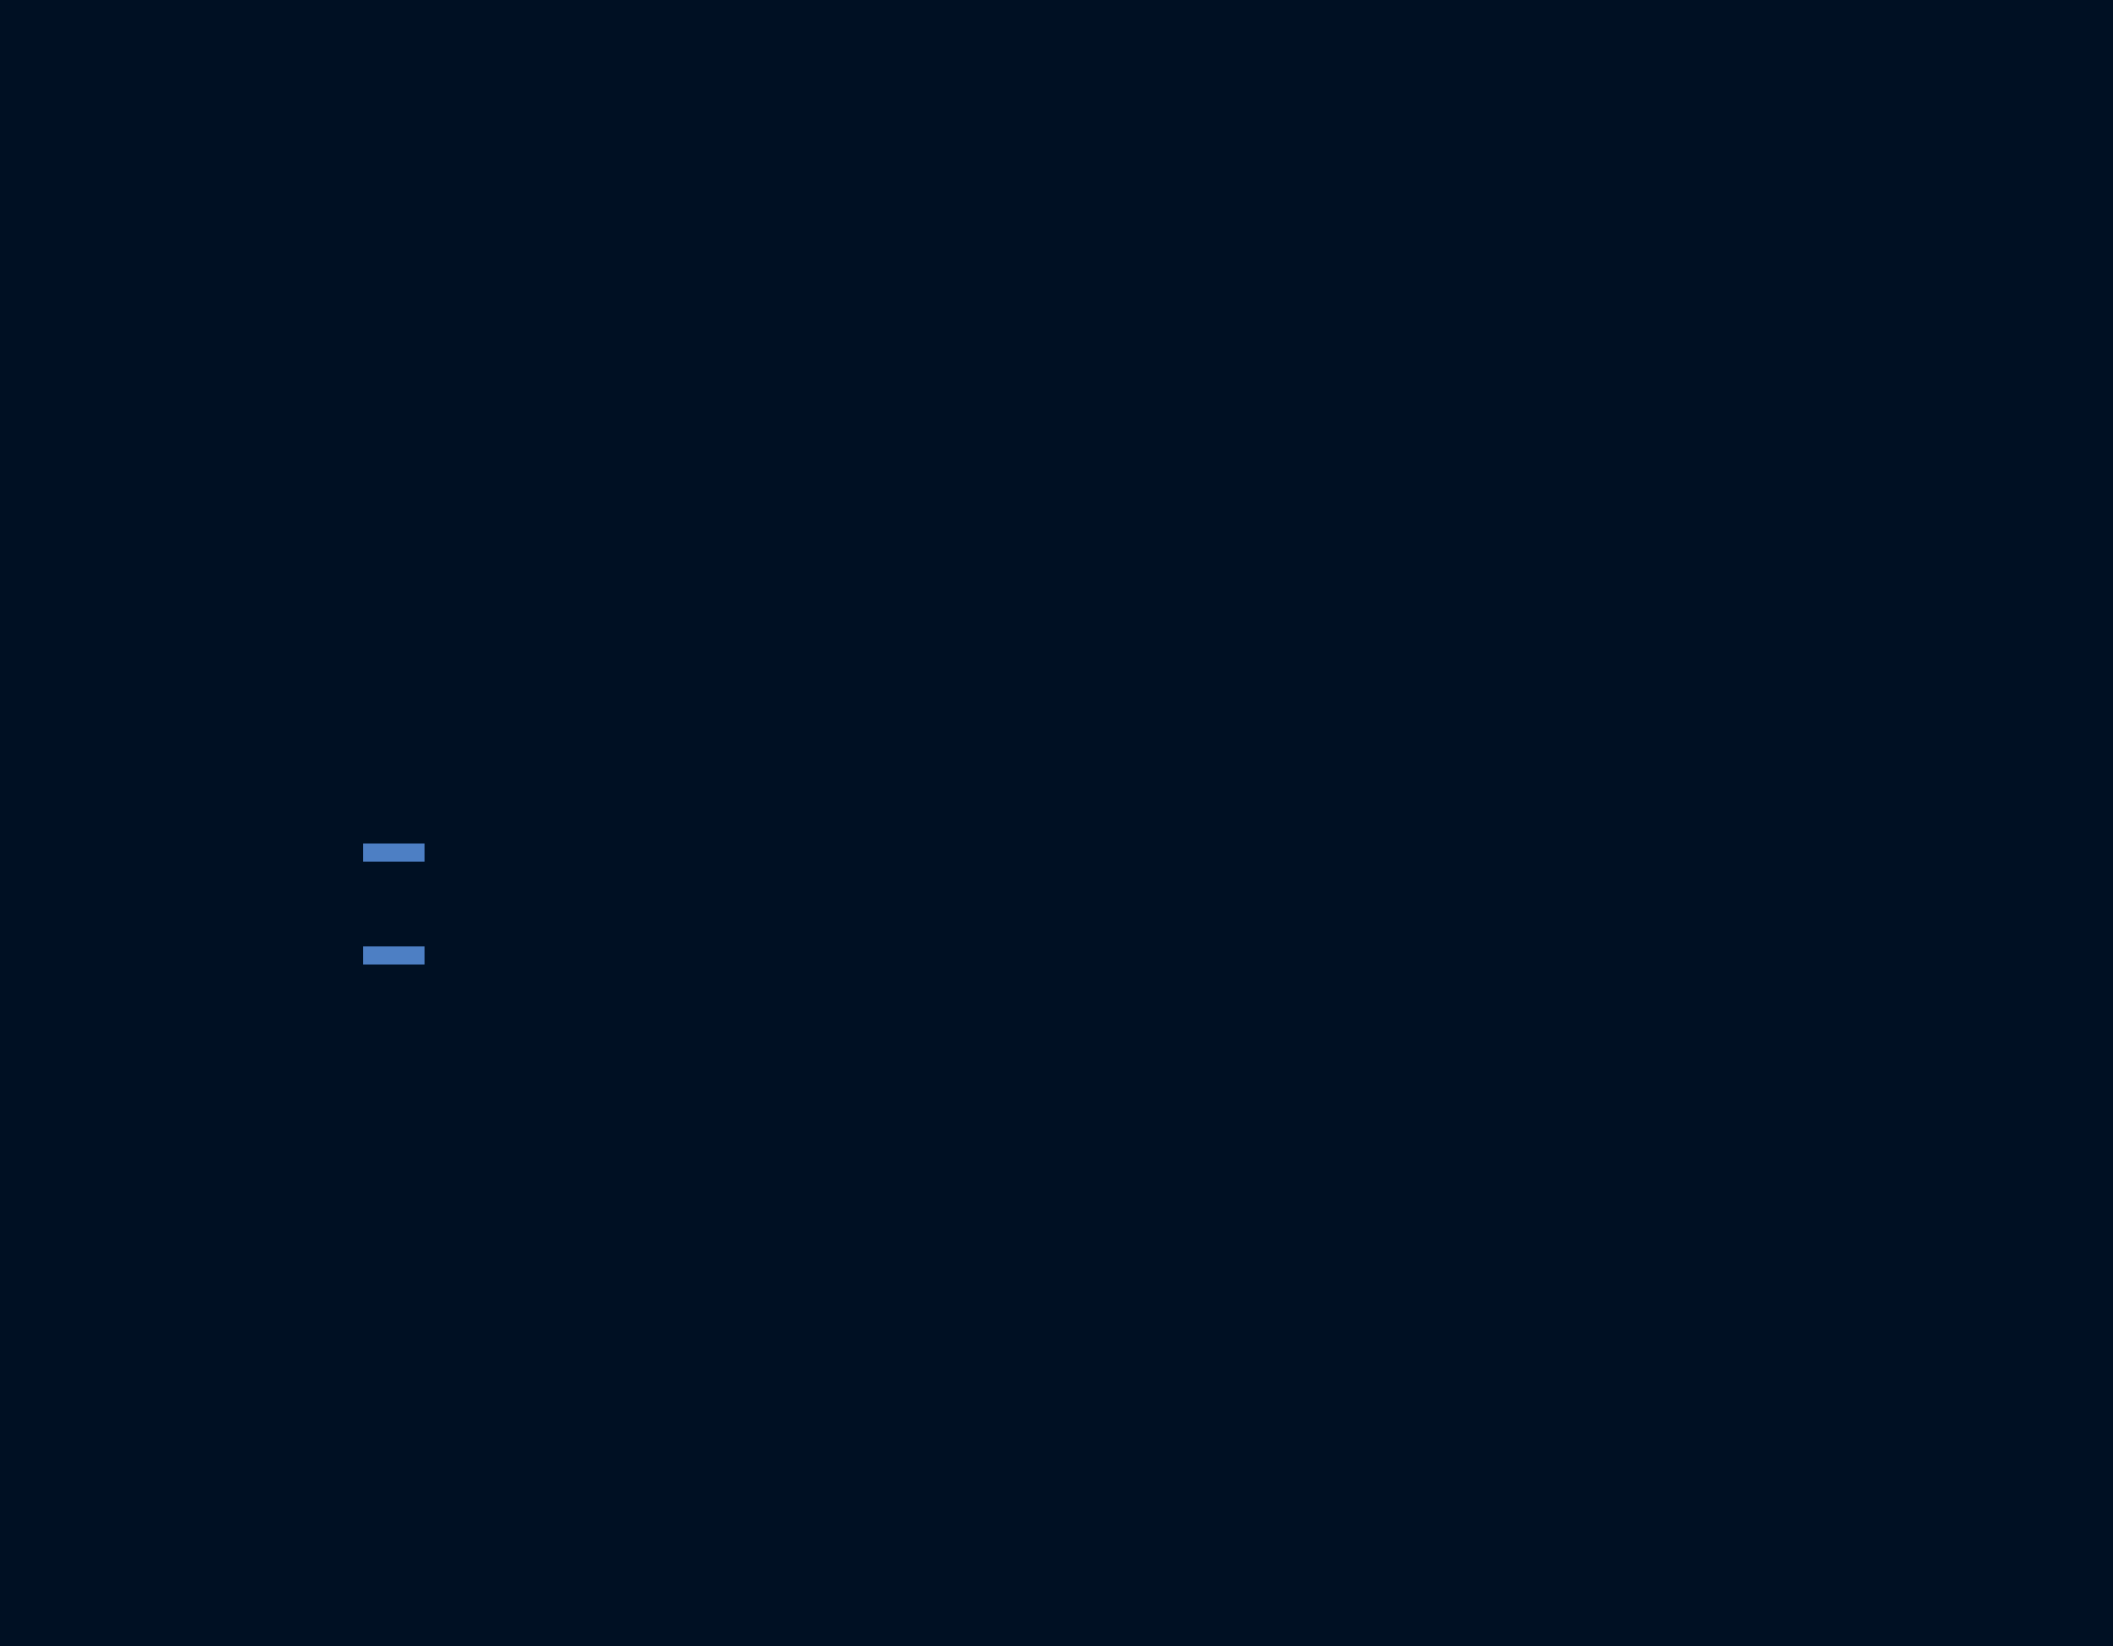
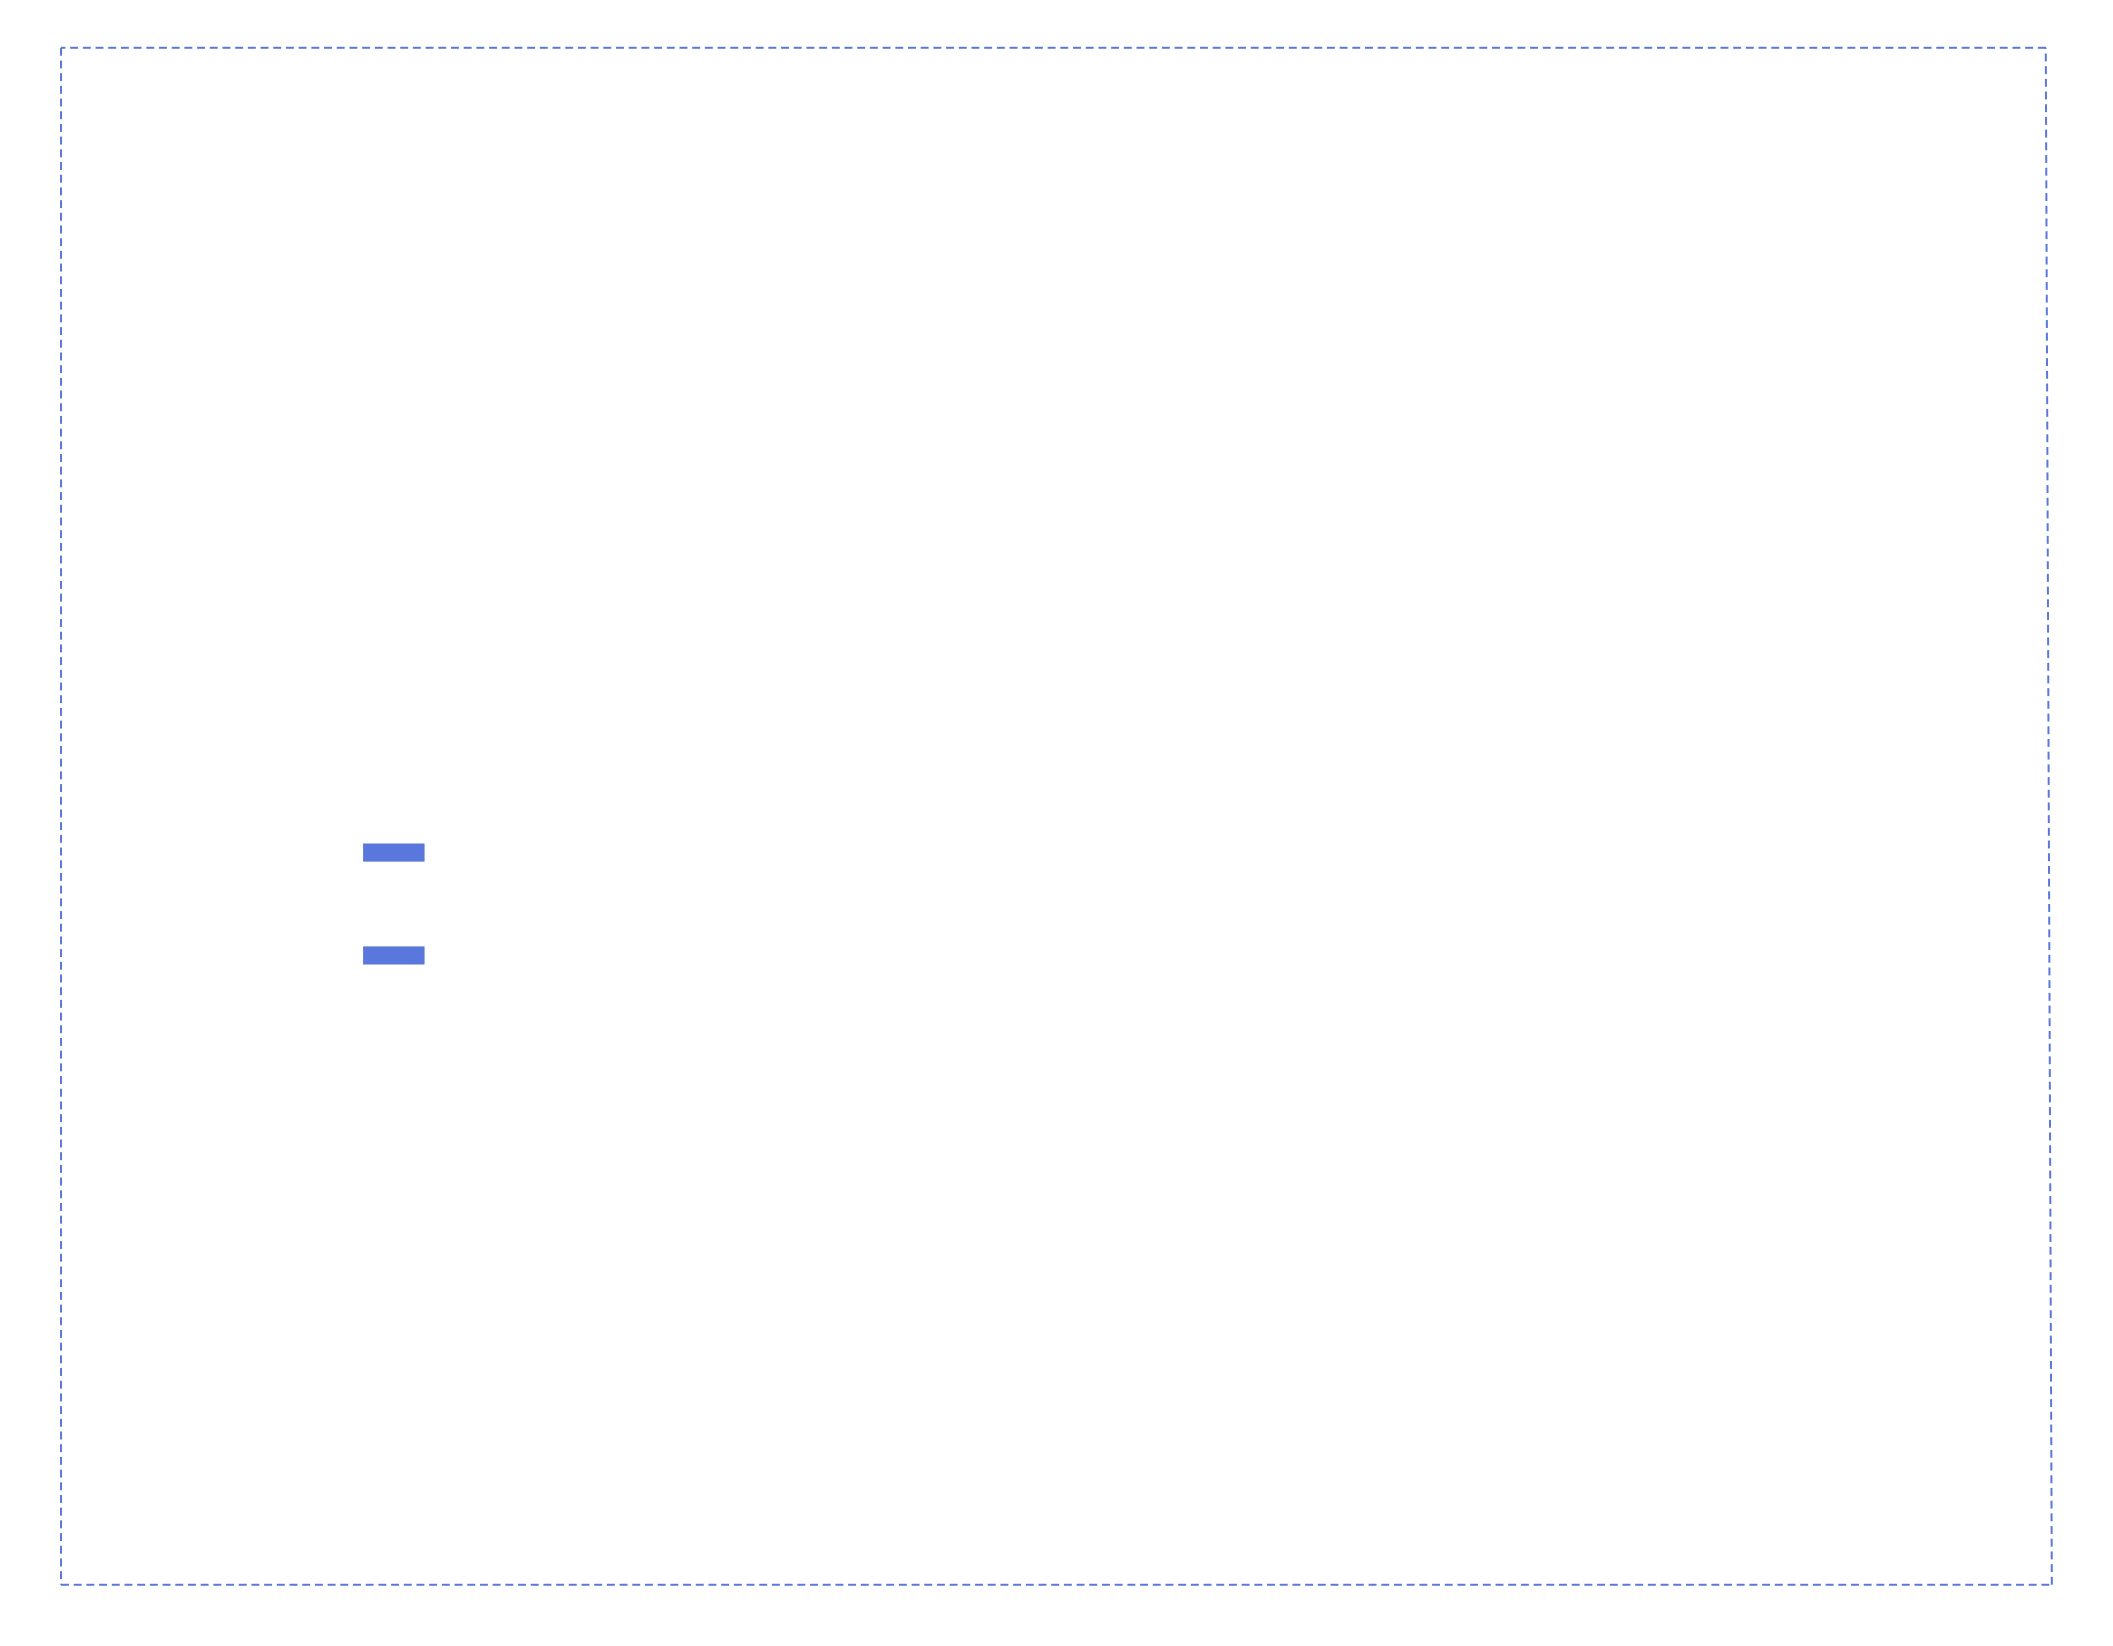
zone outline: none -> (2045, 47) (61, 47) (61, 1584) (2051, 1584) (2045, 47)

